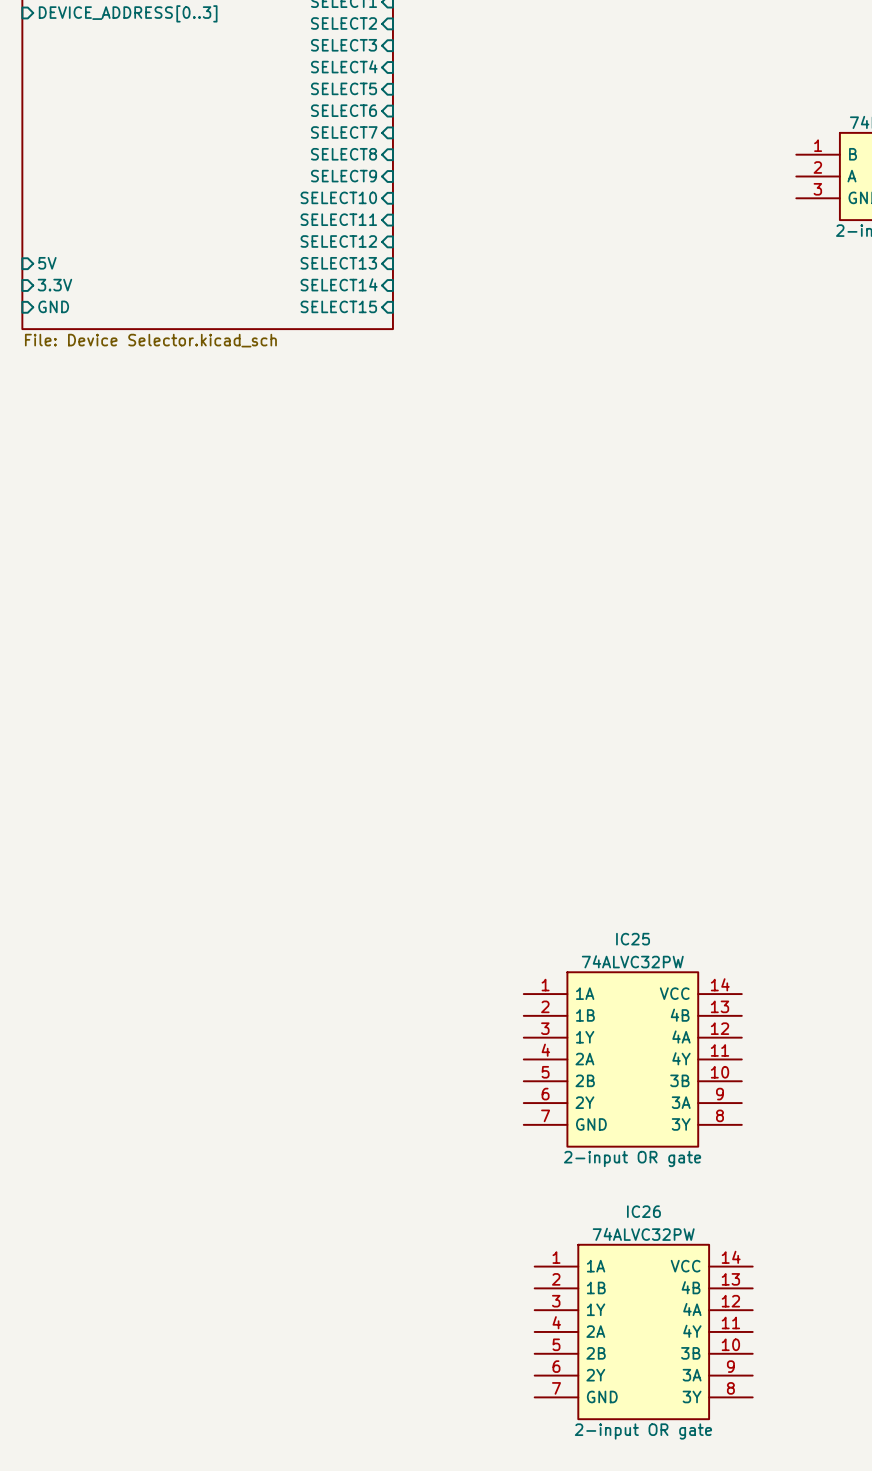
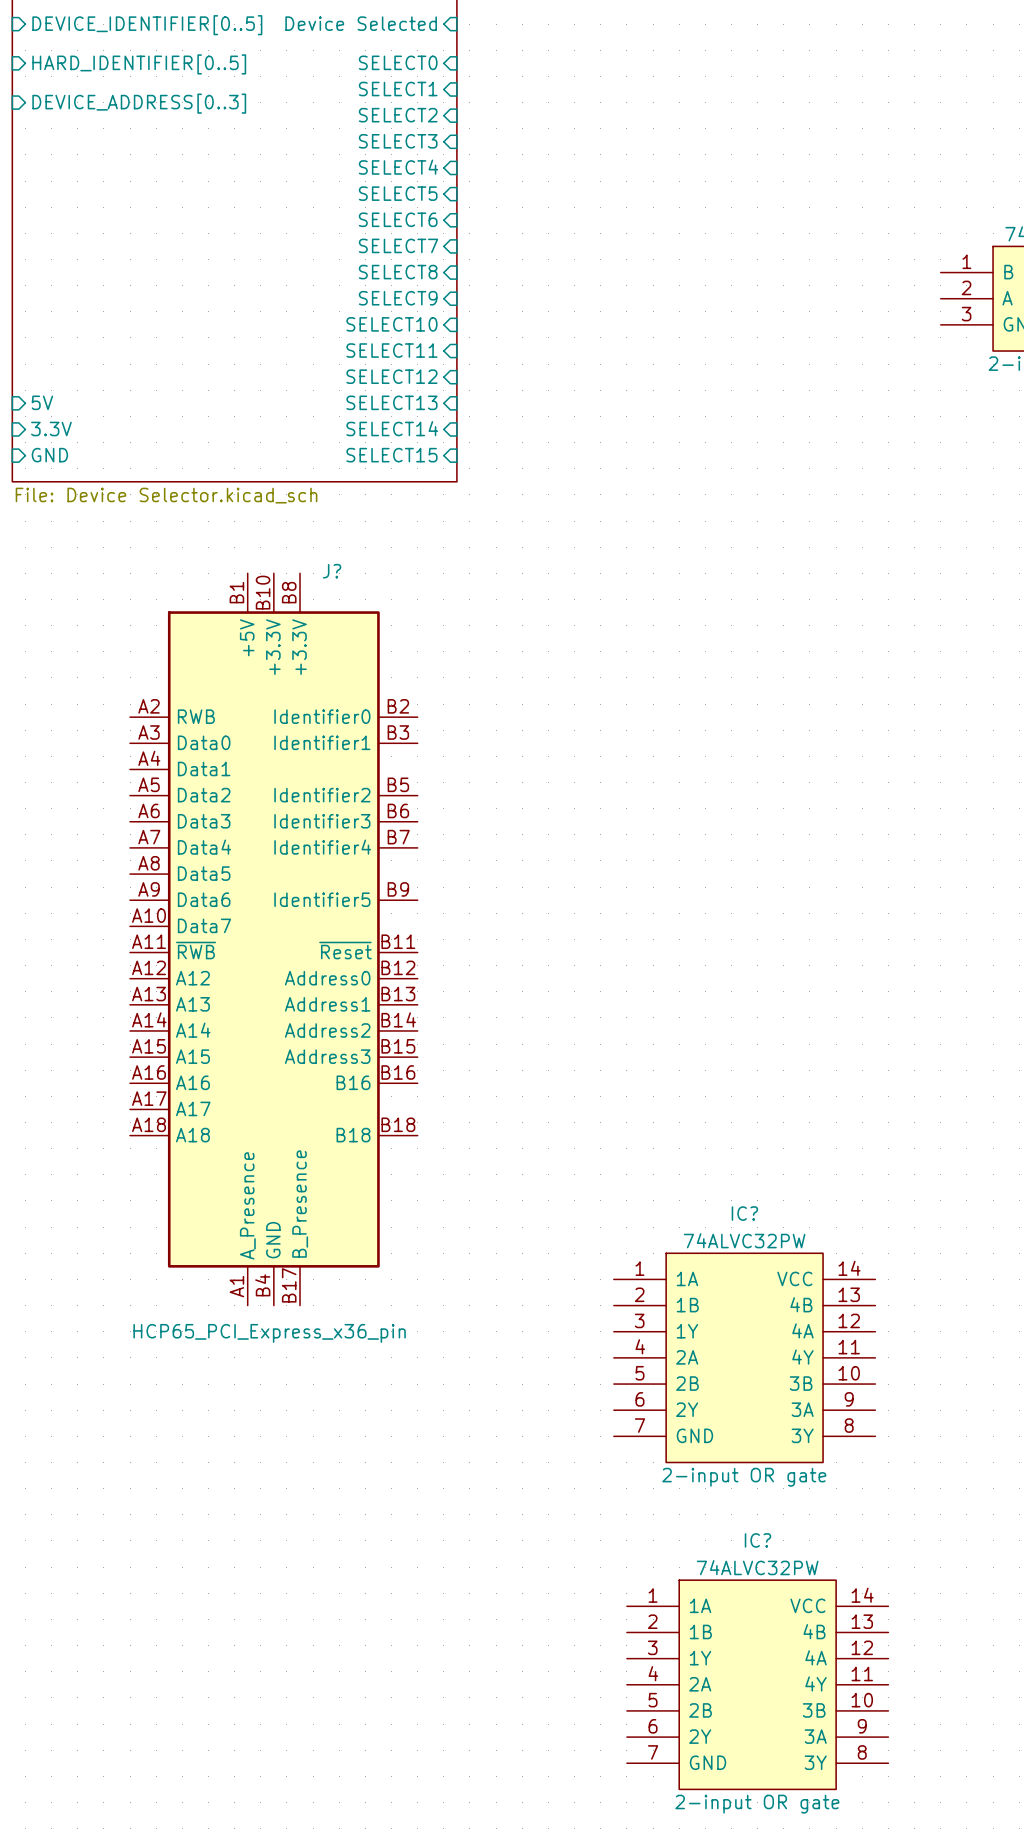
J?: none -> HCP65_PCI_Express_x36_pin (273, 939)
IC25 name: IC25 (633, 939) -> IC? (744, 1213)
IC26 name: IC26 (643, 1211) -> IC? (757, 1540)

